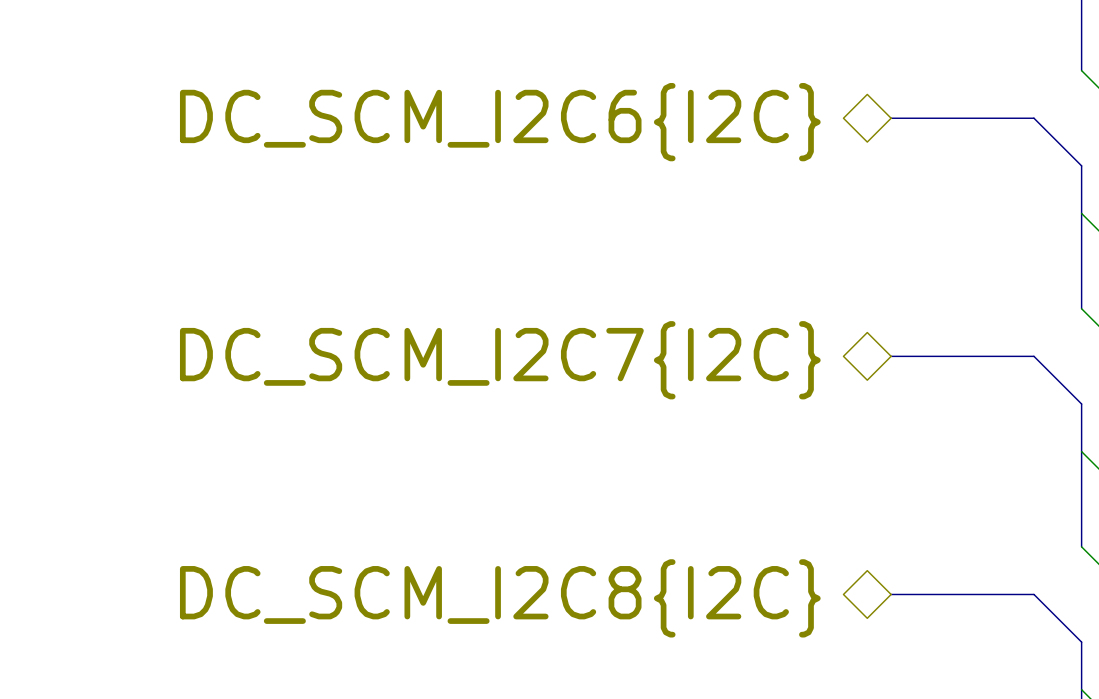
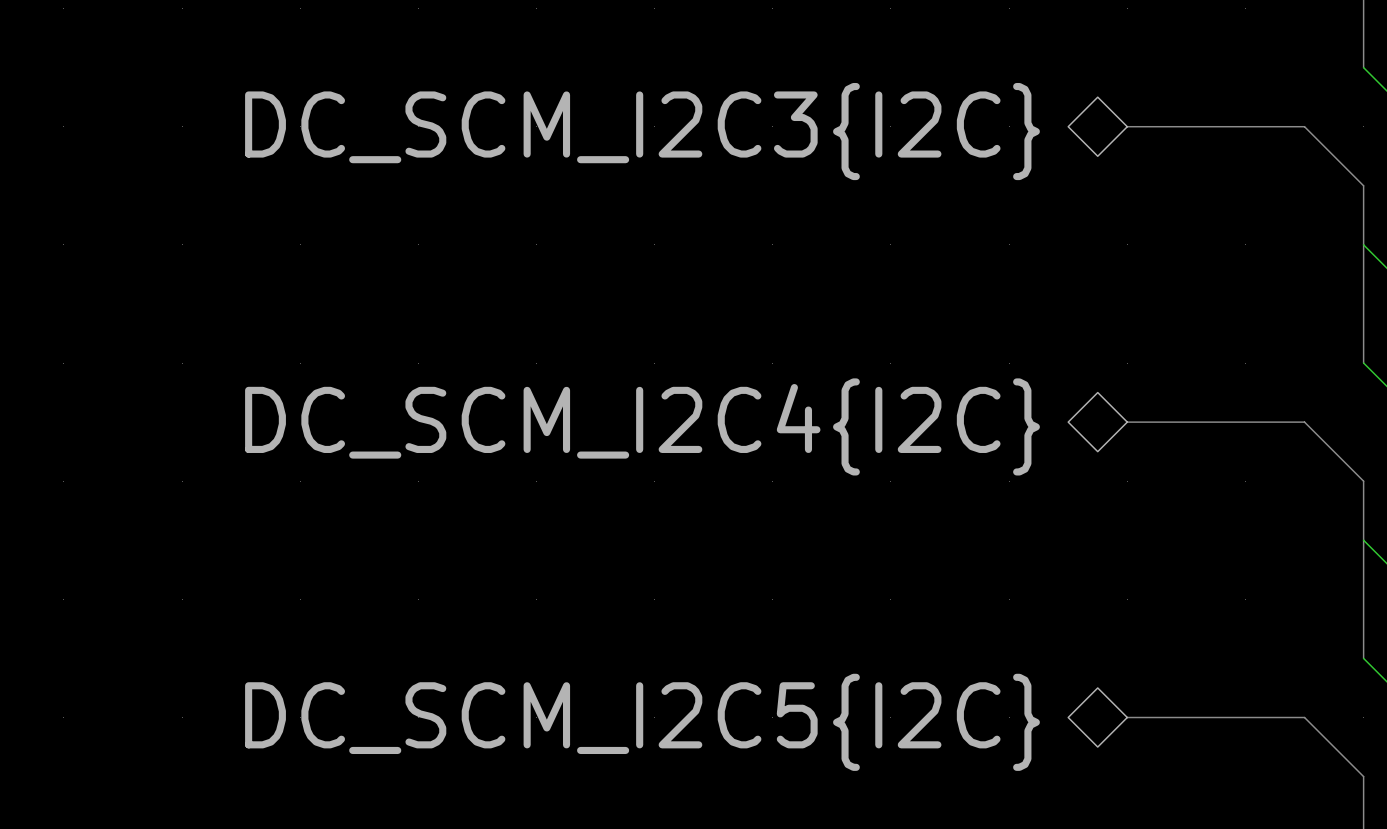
hierarchical label: DC_SCM_I2C6{I2C} (500, 122) -> DC_SCM_I2C3{I2C} (642, 131)
hierarchical label: DC_SCM_I2C7{I2C} (500, 360) -> DC_SCM_I2C4{I2C} (642, 426)
hierarchical label: DC_SCM_I2C8{I2C} (500, 598) -> DC_SCM_I2C5{I2C} (642, 722)

